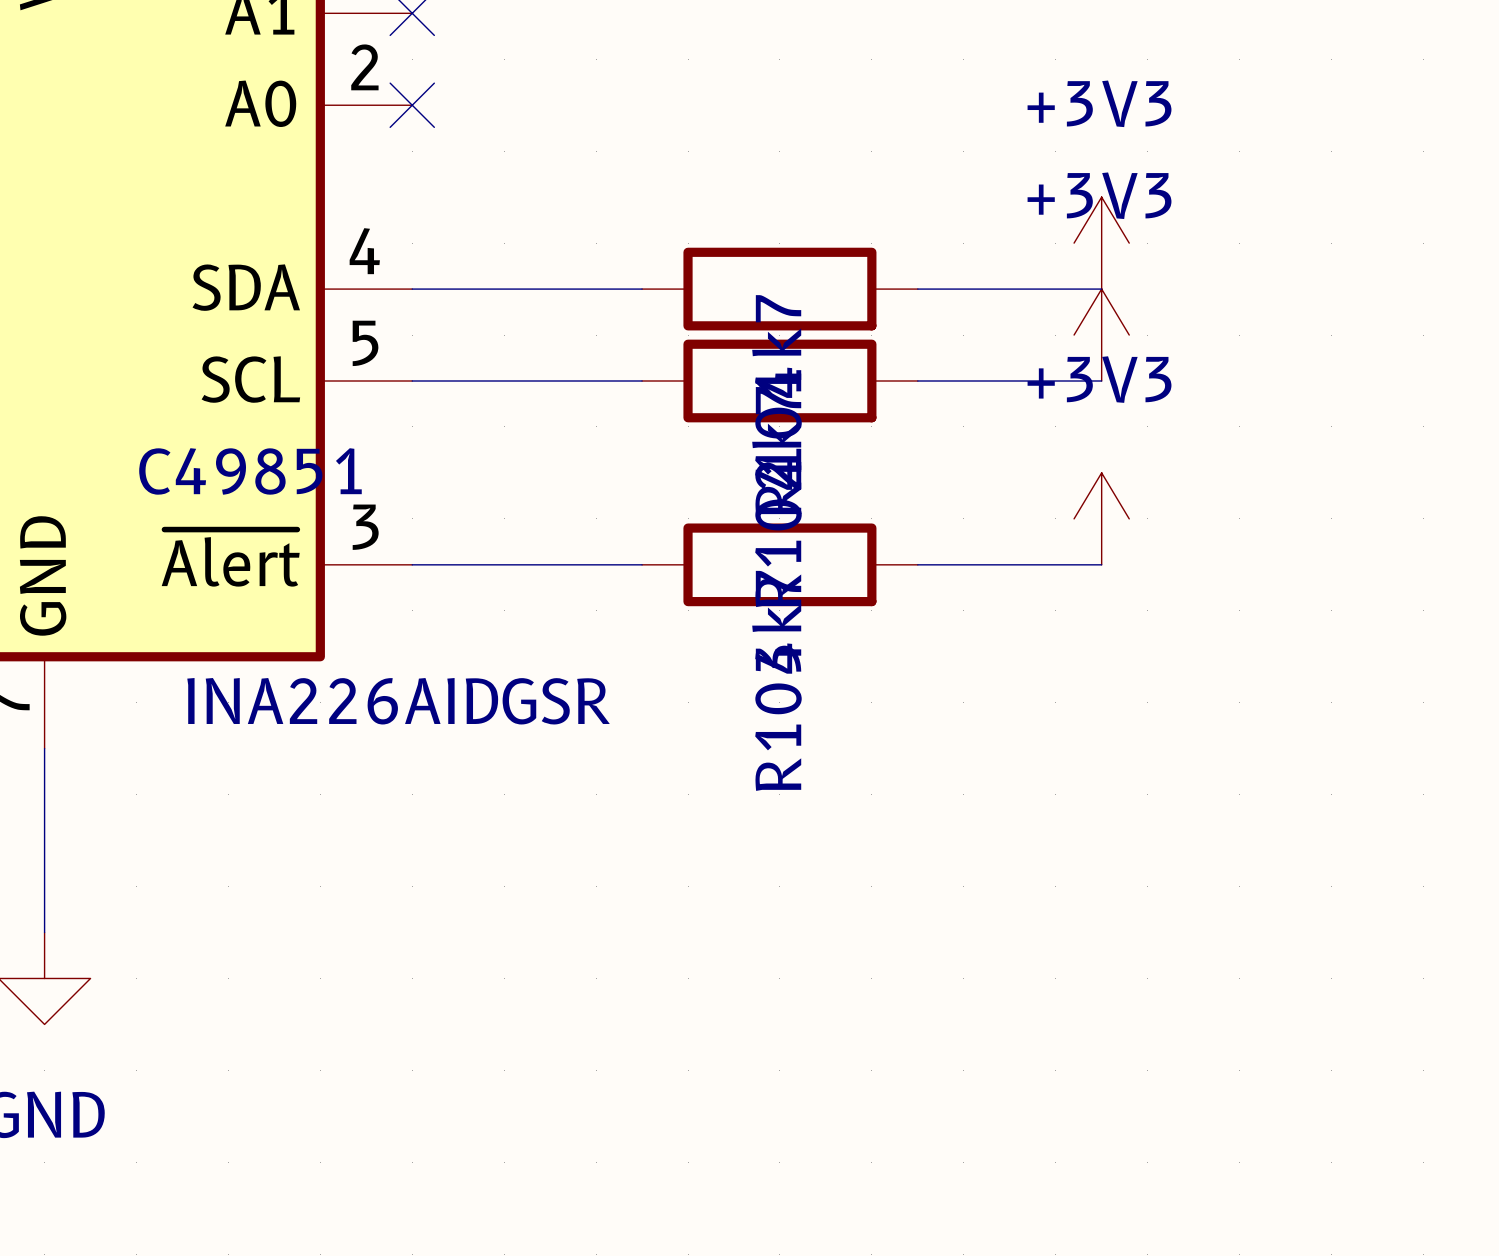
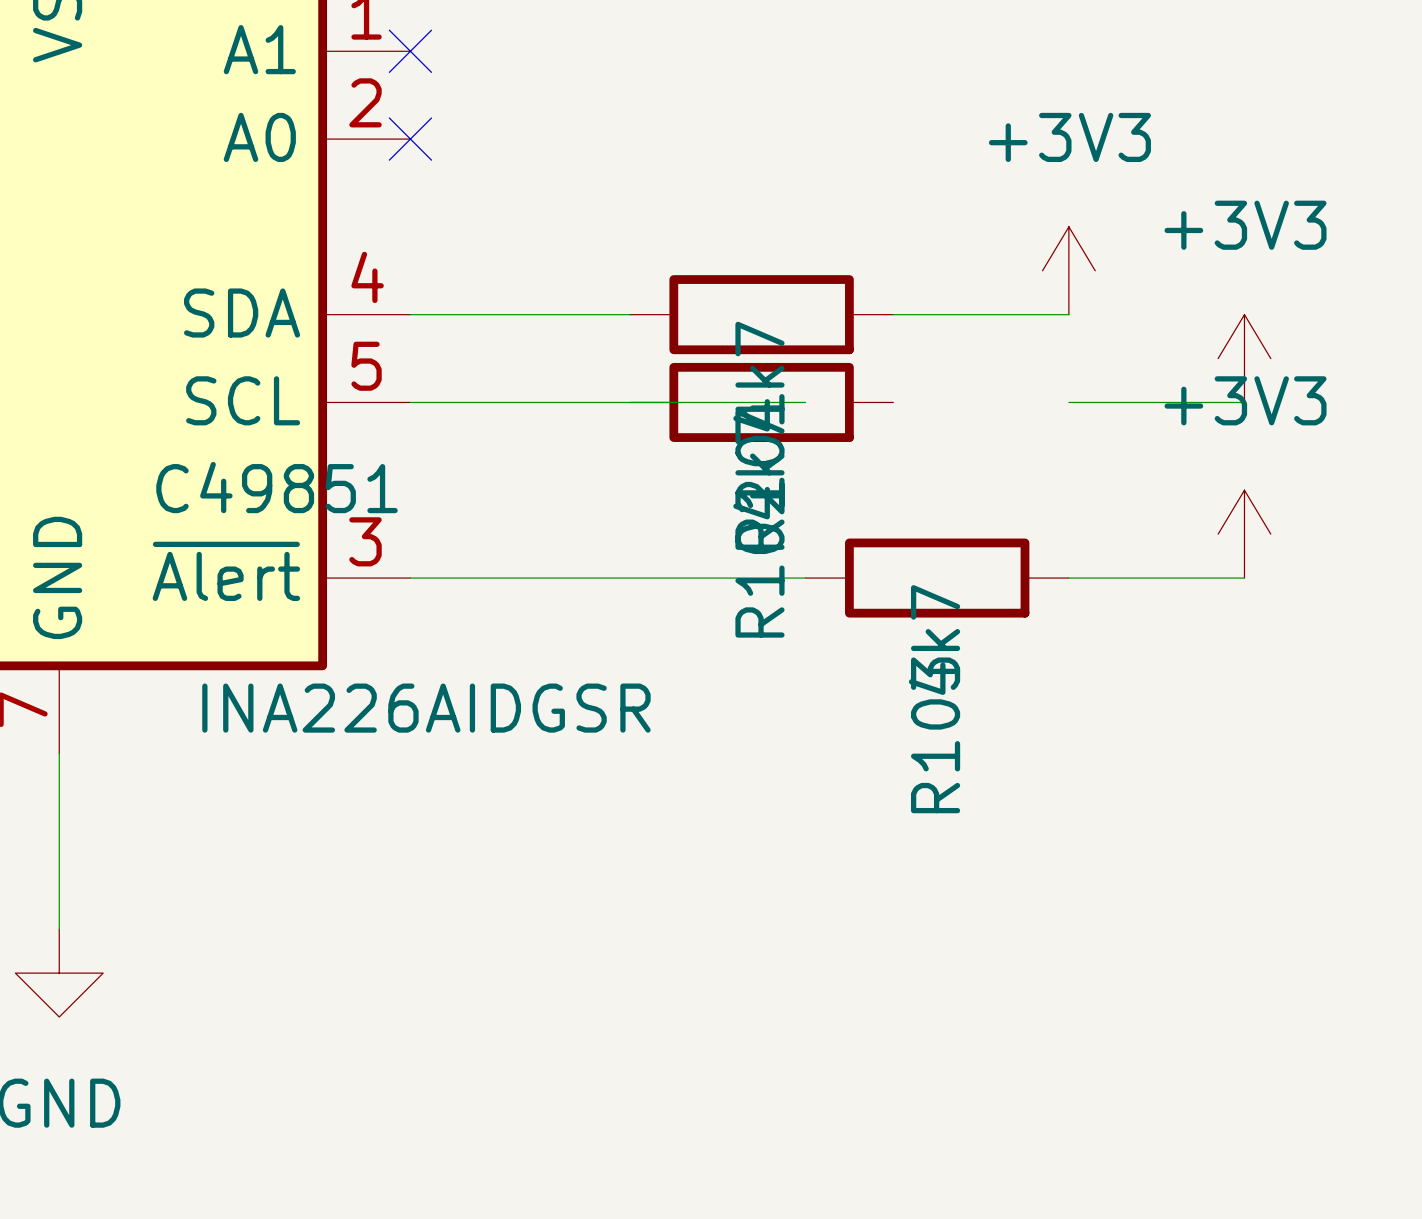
power symbol: +3V3 (1101, 335) -> none
power symbol: none -> +3V3 (1244, 358)
wire: none -> (629, 402) (805, 402)
wire: (917, 380) (1101, 380) -> (1244, 402) (1068, 402)
power symbol: +3V3 (1101, 518) -> none
power symbol: none -> +3V3 (1244, 534)
wire: none -> (629, 578) (805, 578)
R103 position: (779, 564) -> (937, 578)
wire: (917, 564) (1101, 564) -> (1244, 578) (1068, 578)

